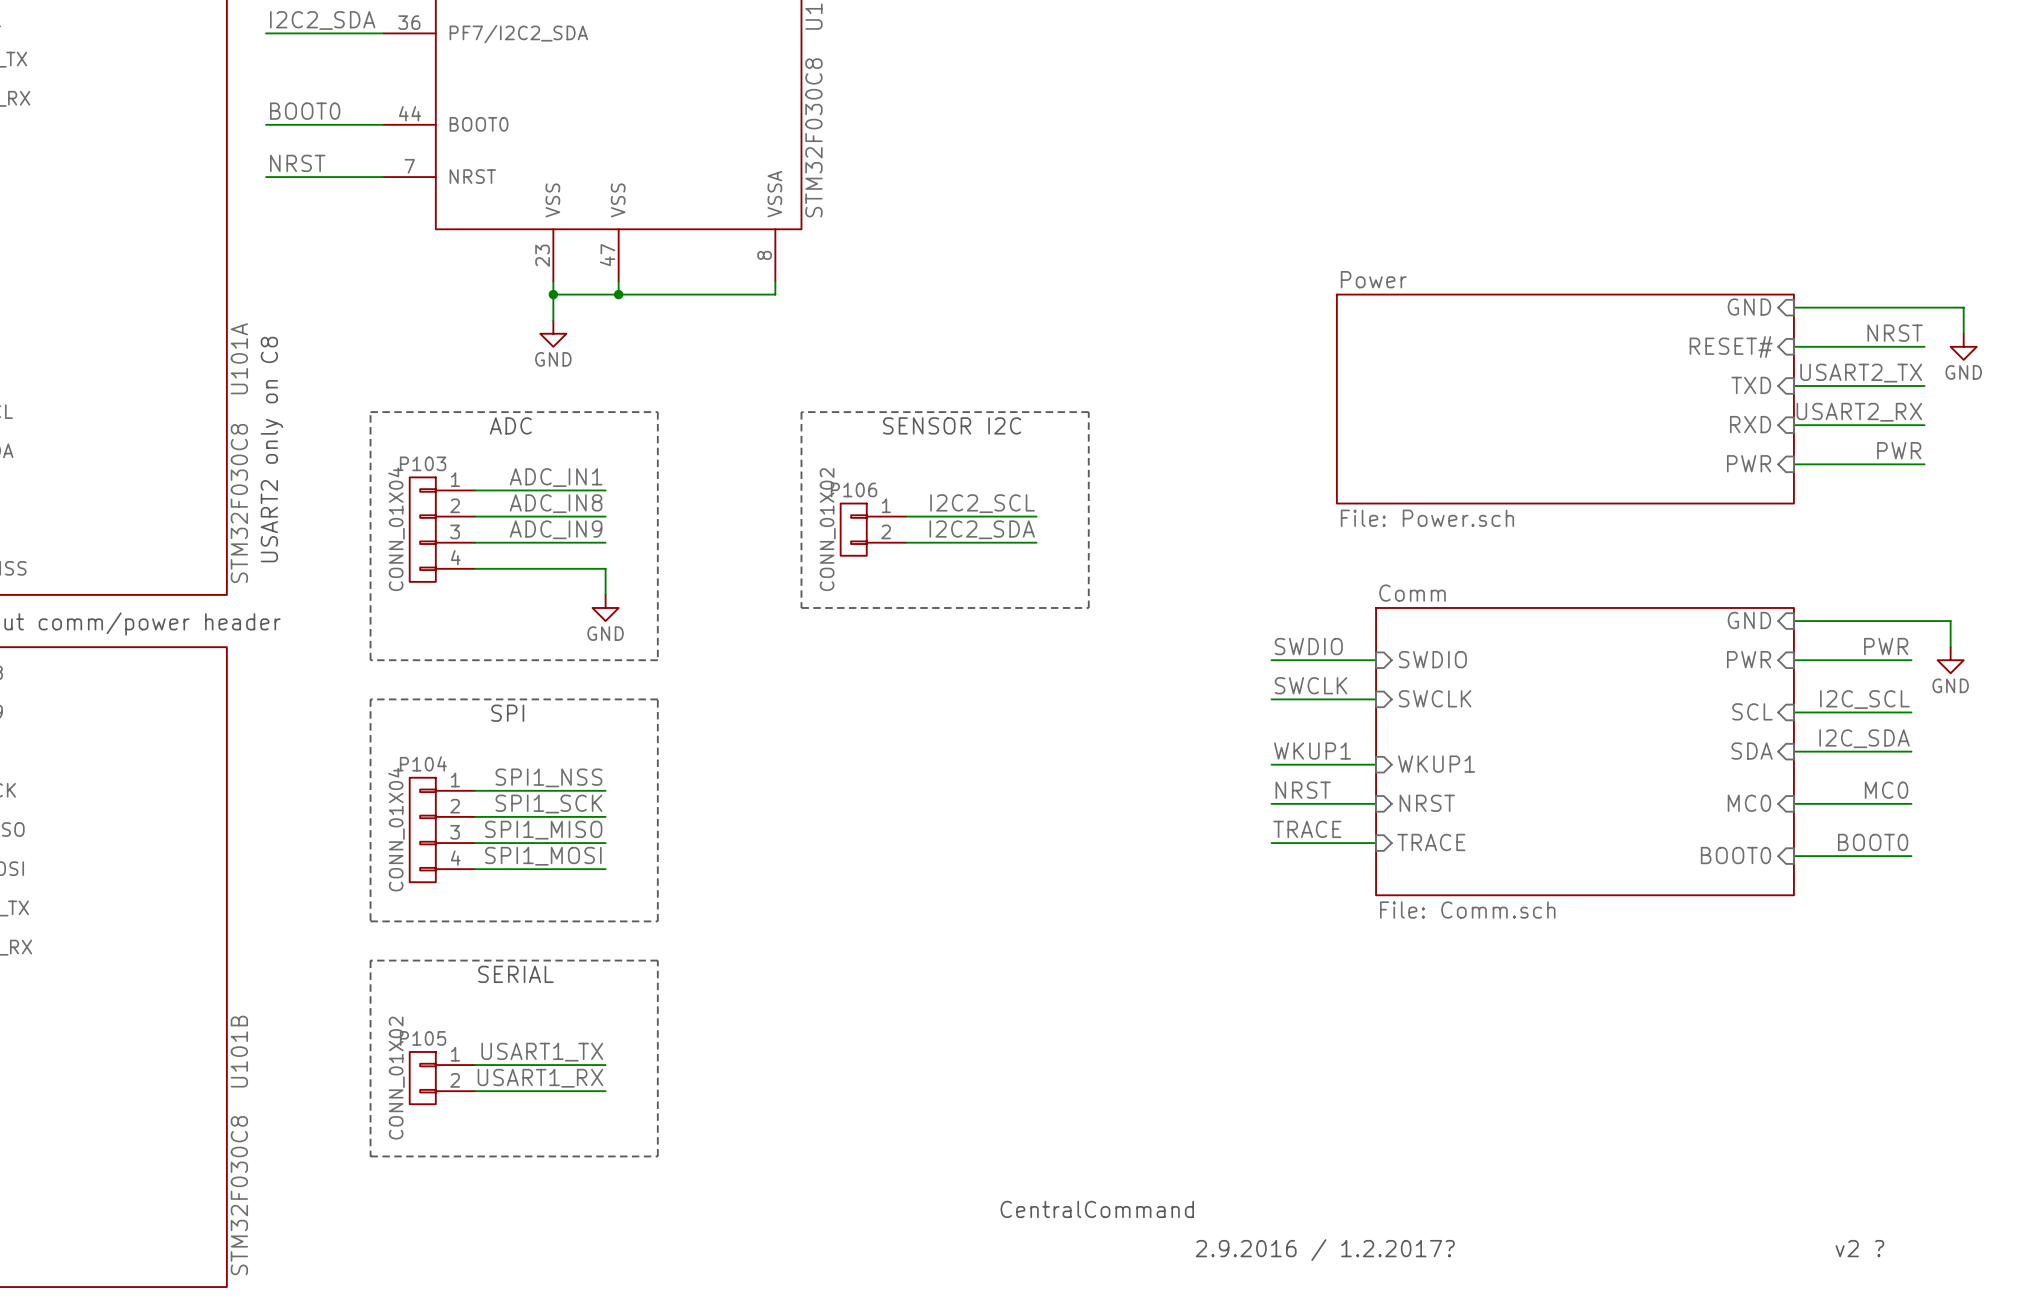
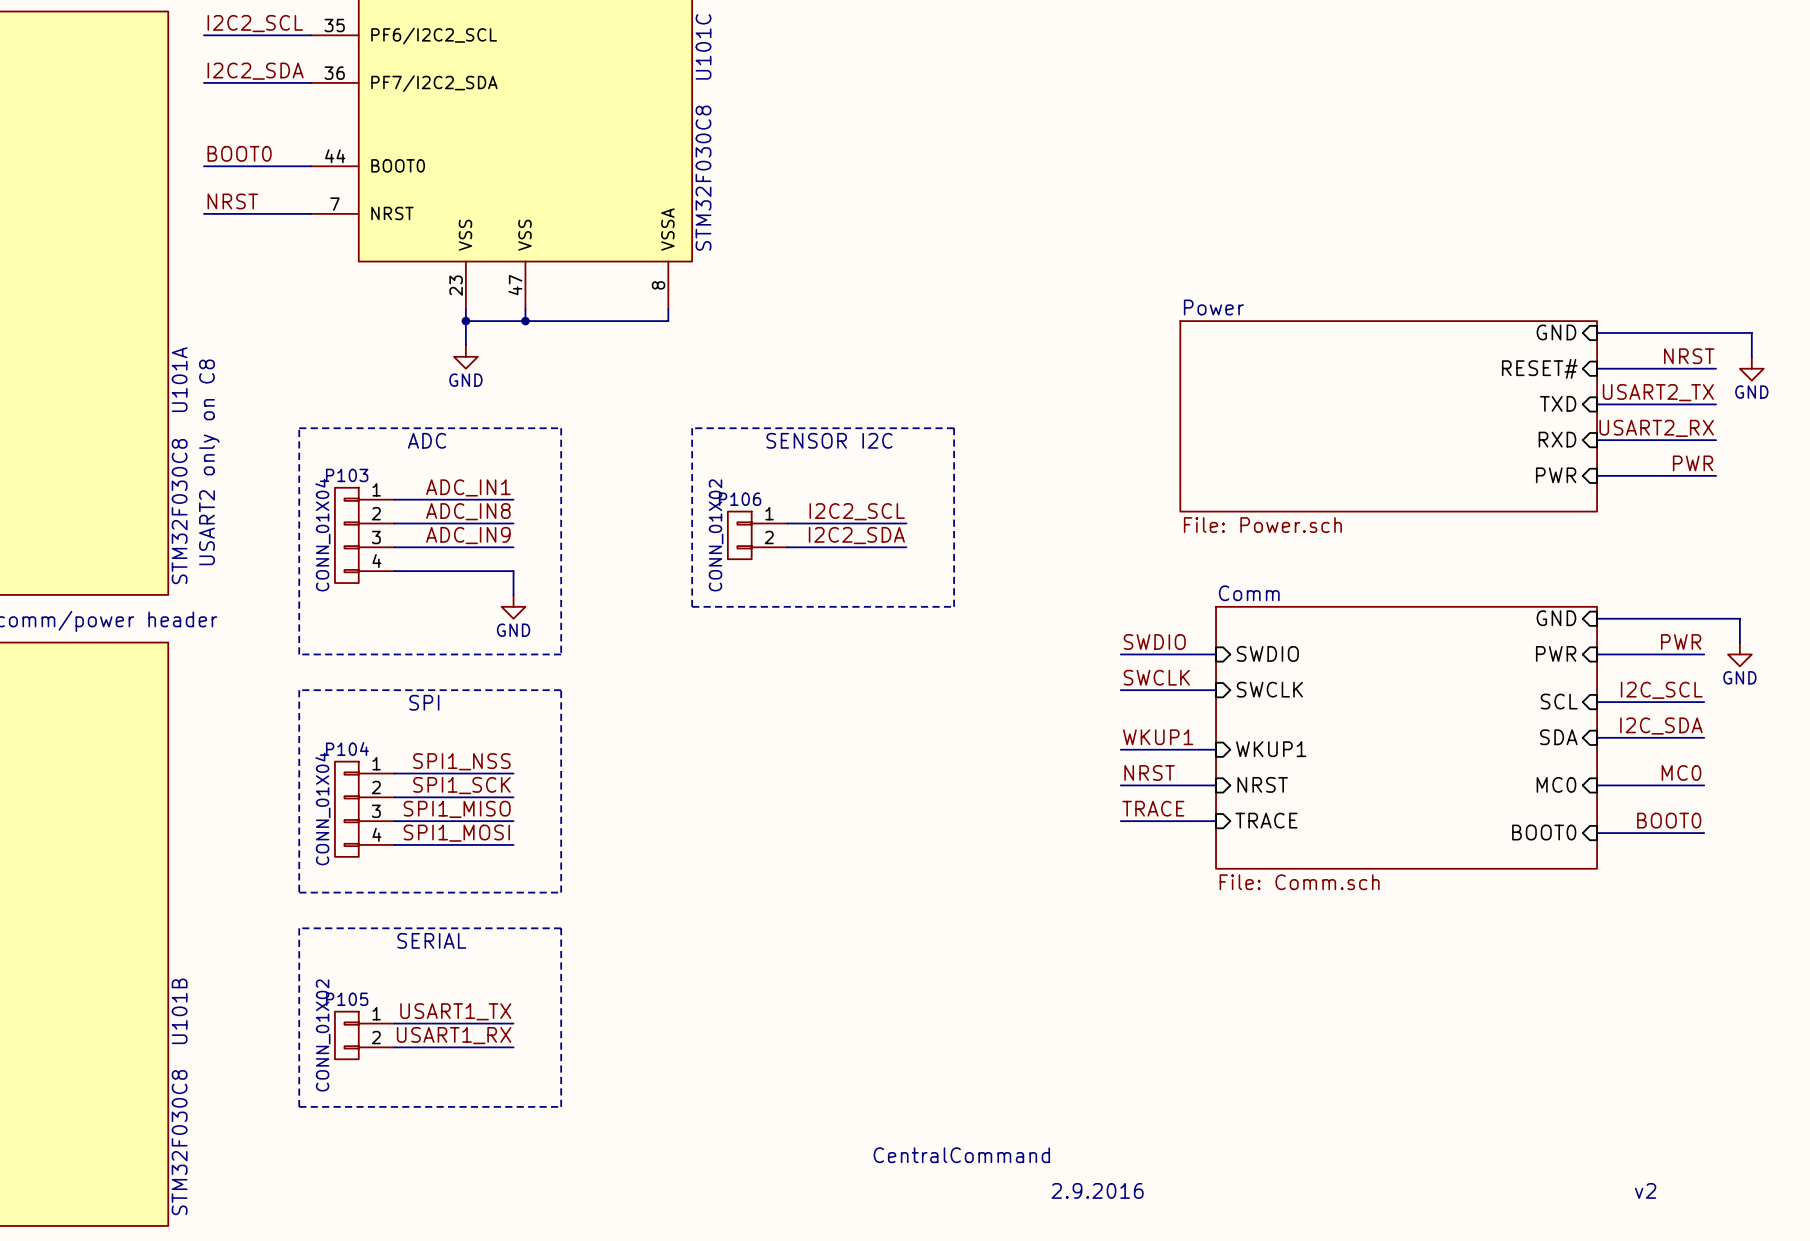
text: v2 ? (1859, 1248) -> v2 (1645, 1190)
text: 2.9.2016 / 1.2.2017? (1325, 1250) -> 2.9.2016 (1097, 1190)

